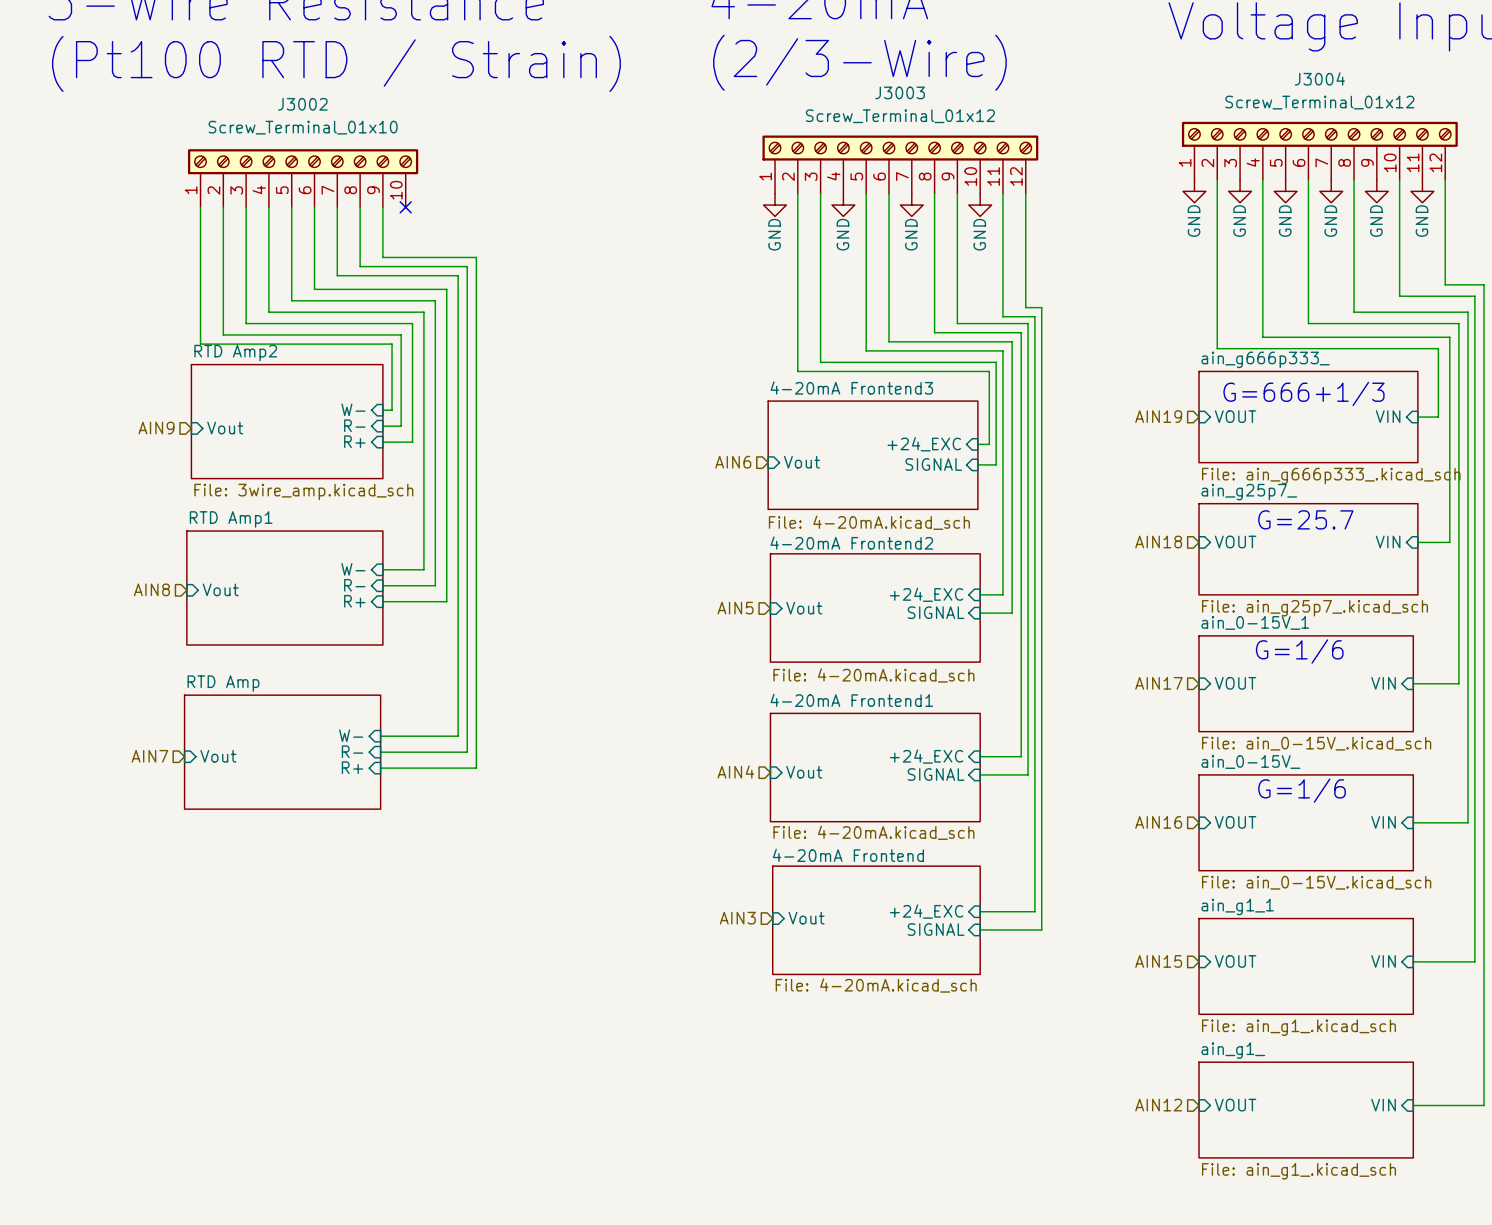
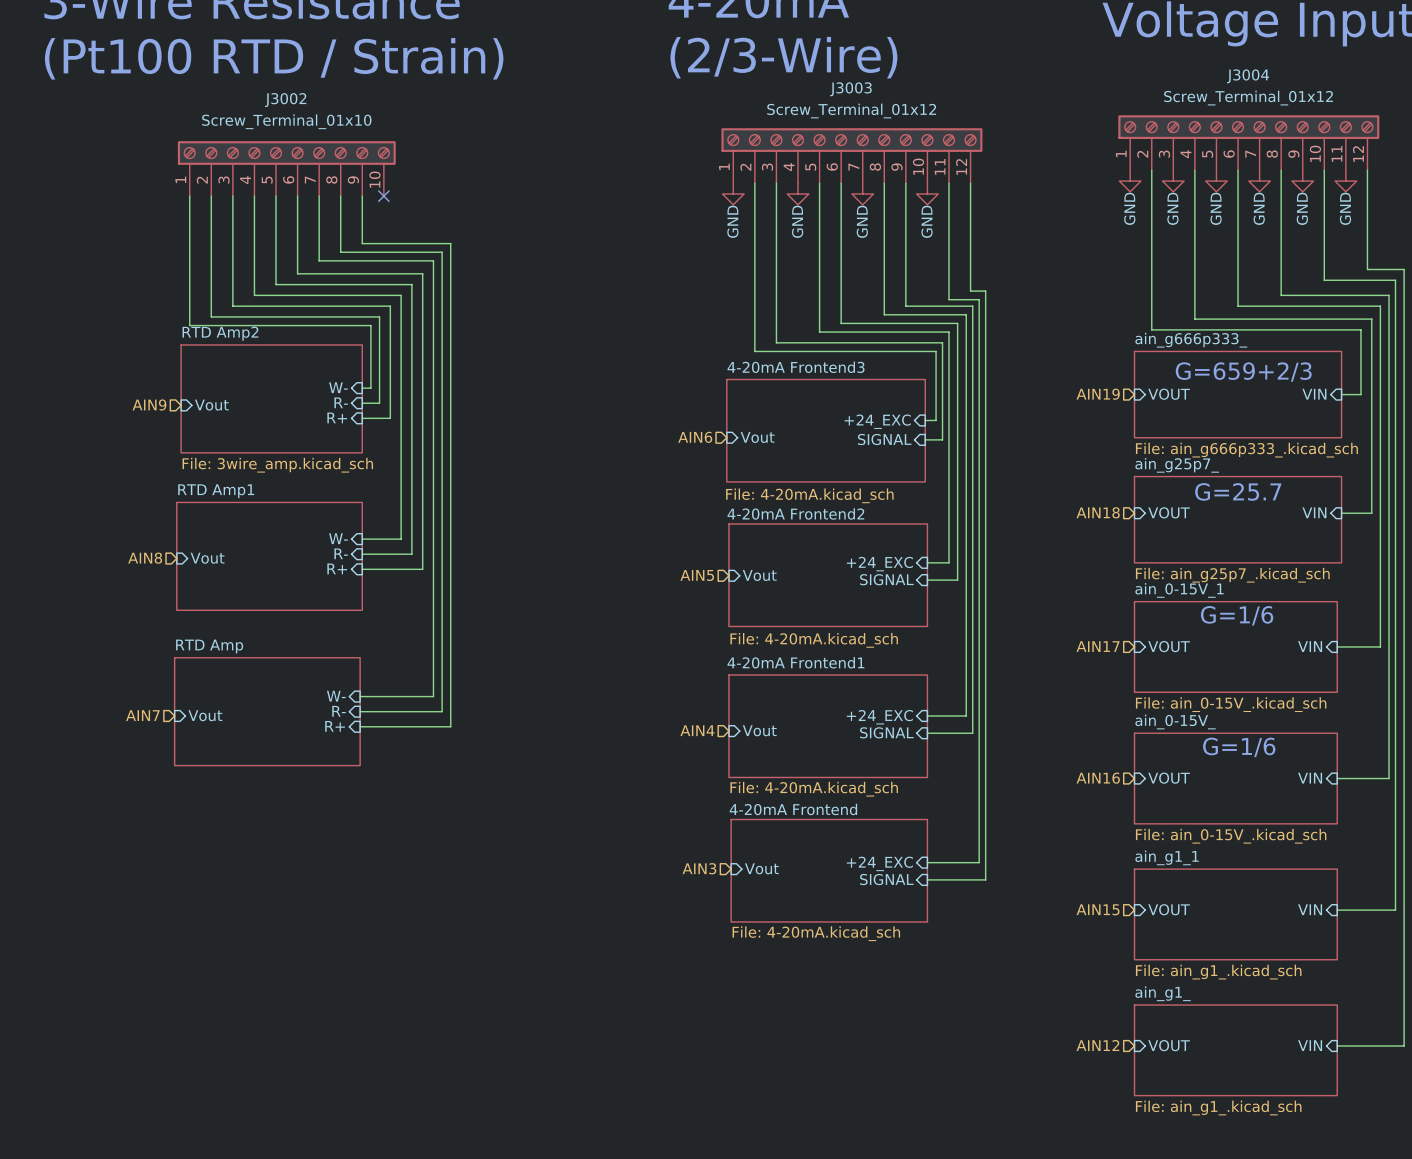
text: G=666+1/3 (1303, 393) -> G=659+2/3 (1243, 372)

